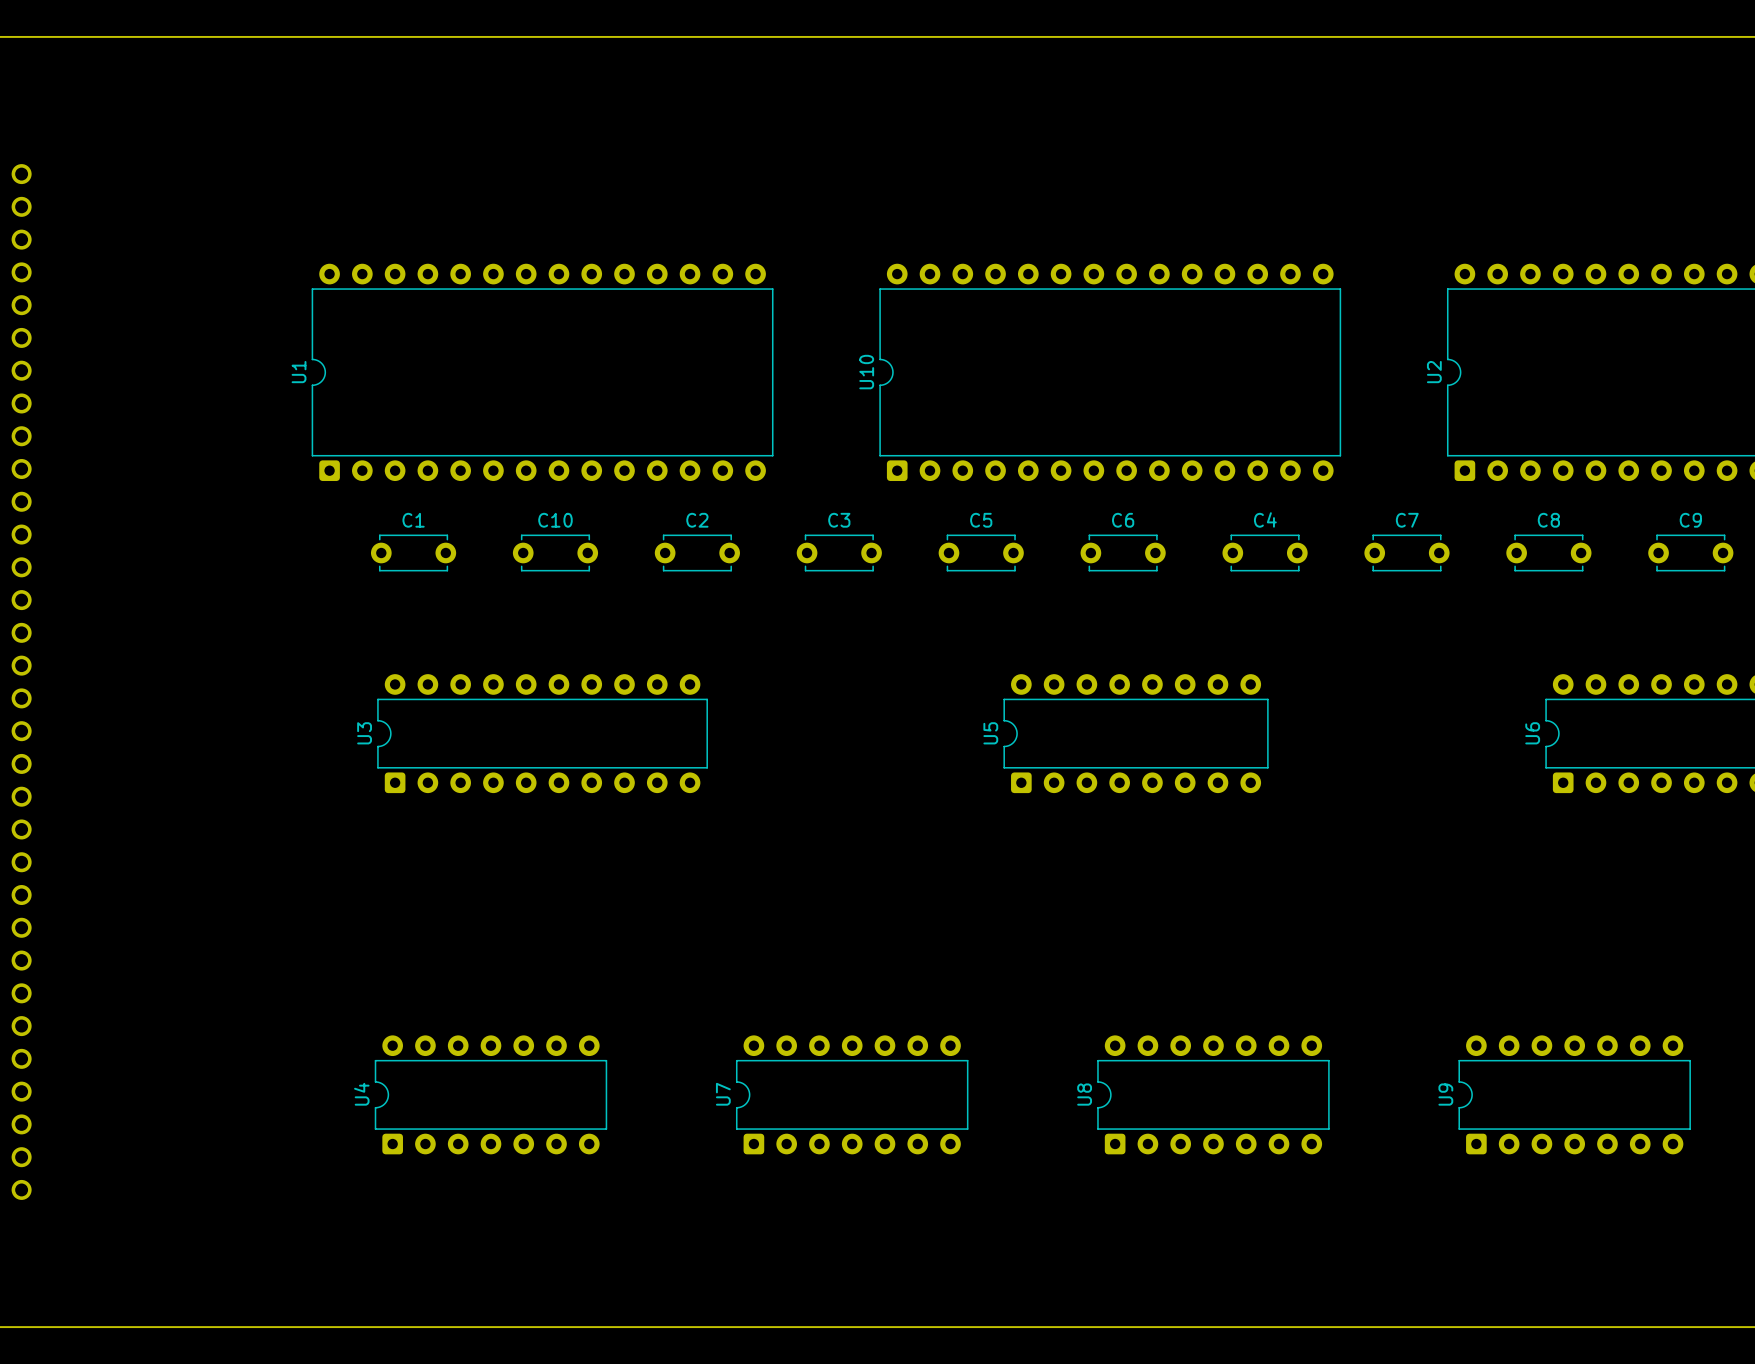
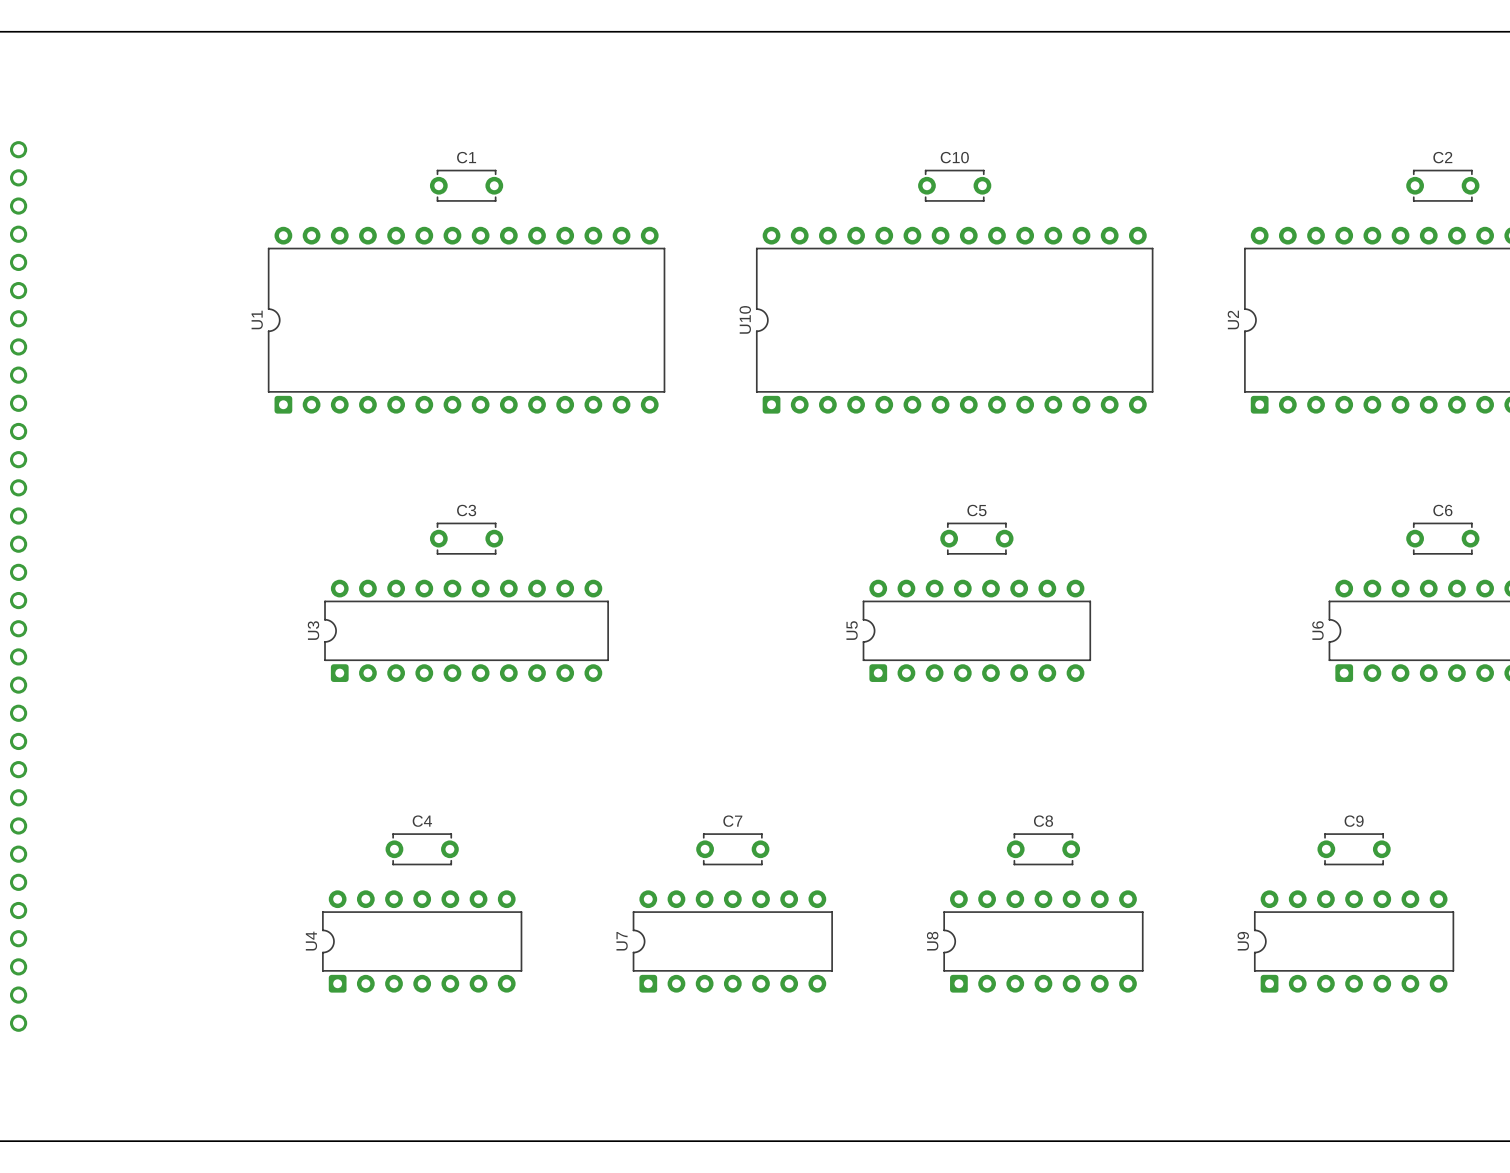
C1 position: (413, 553) -> (466, 185)
C10 position: (555, 553) -> (954, 185)
C2 position: (697, 553) -> (1442, 185)
C3 position: (839, 553) -> (466, 538)
C5 position: (981, 553) -> (976, 538)
C6 position: (1123, 553) -> (1442, 538)
C4 position: (1265, 553) -> (422, 849)
C7 position: (1406, 553) -> (732, 849)
C8 position: (1548, 553) -> (1043, 849)
C9 position: (1690, 553) -> (1354, 849)

